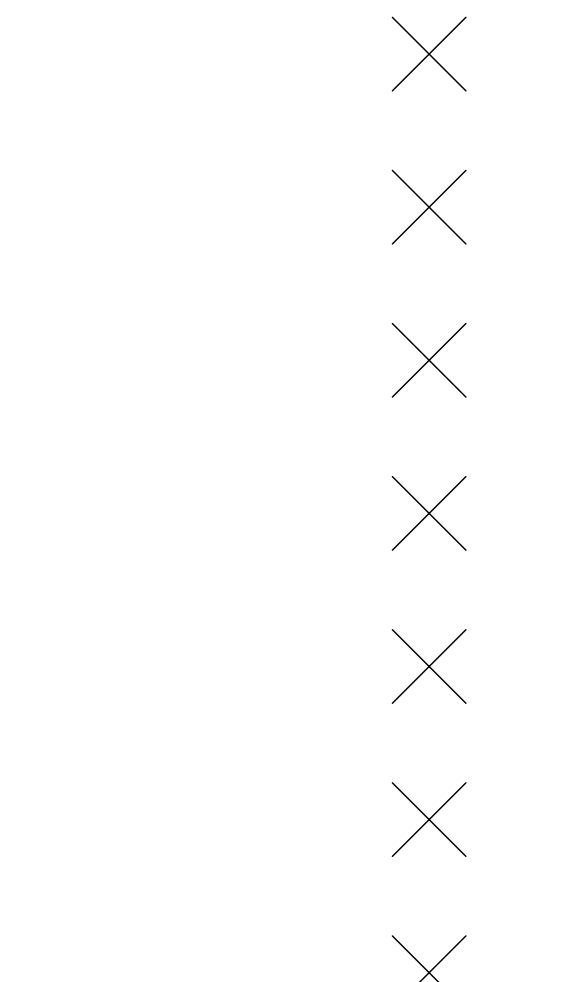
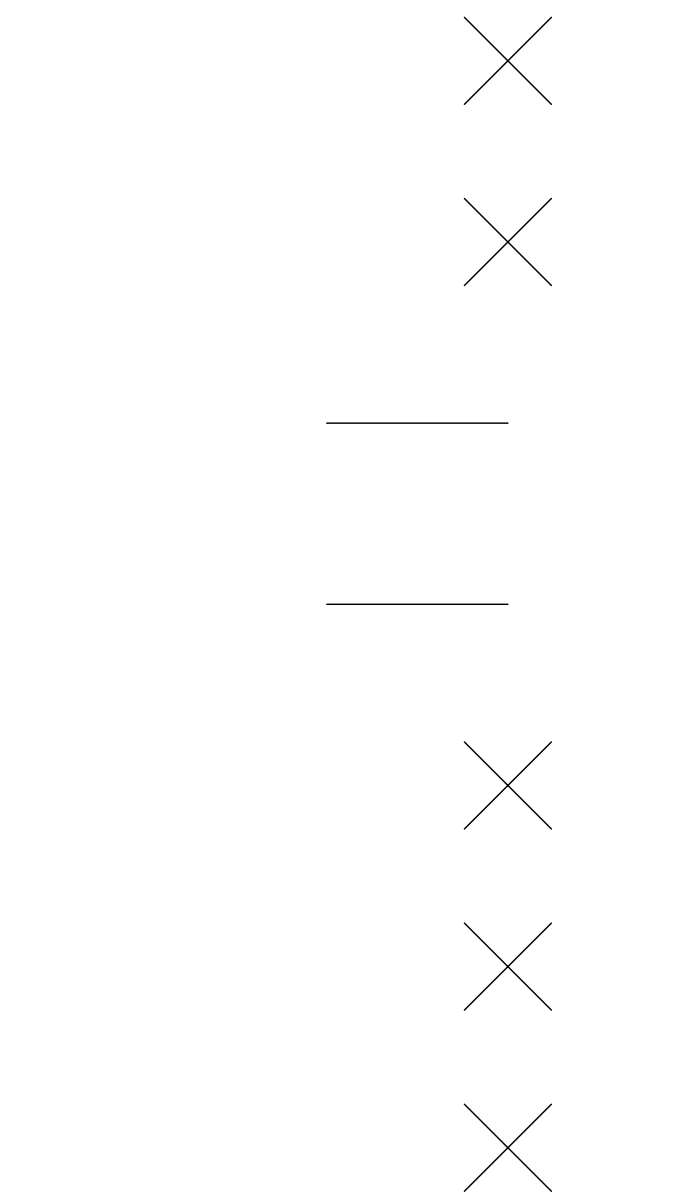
wire: none -> (326, 423) (507, 423)
no-connect mark: (429, 360) -> none
wire: none -> (326, 604) (507, 604)
no-connect mark: (429, 513) -> none

